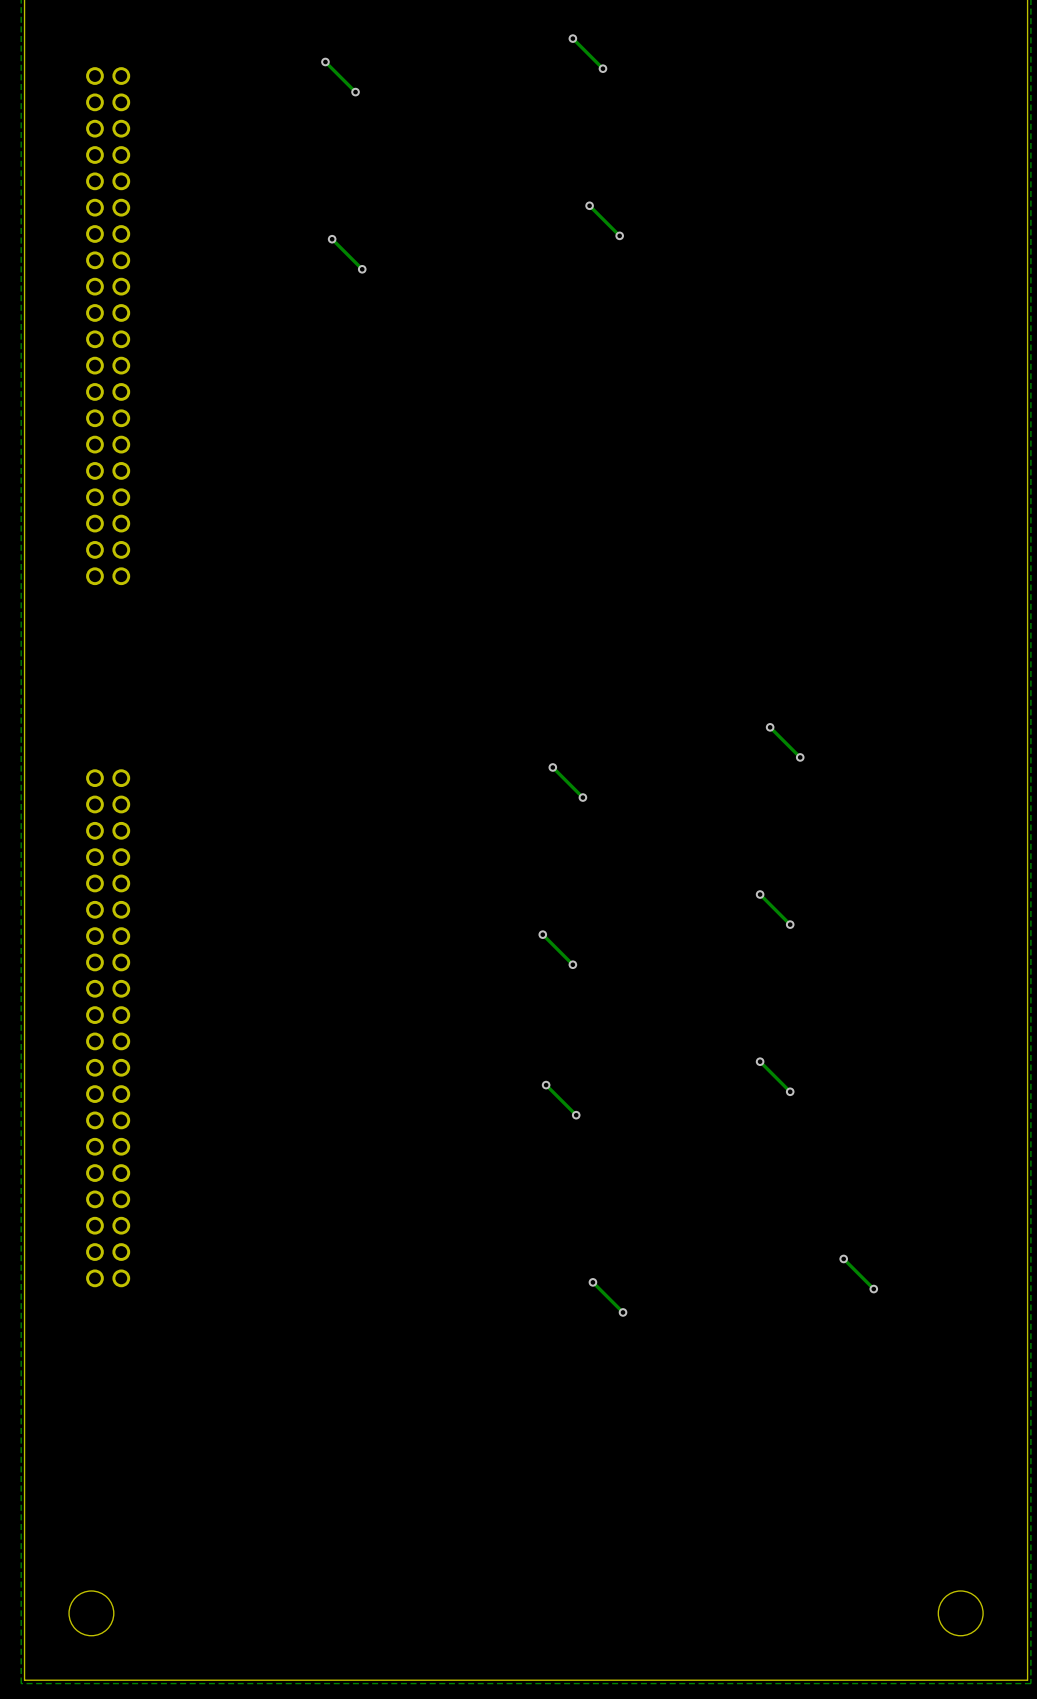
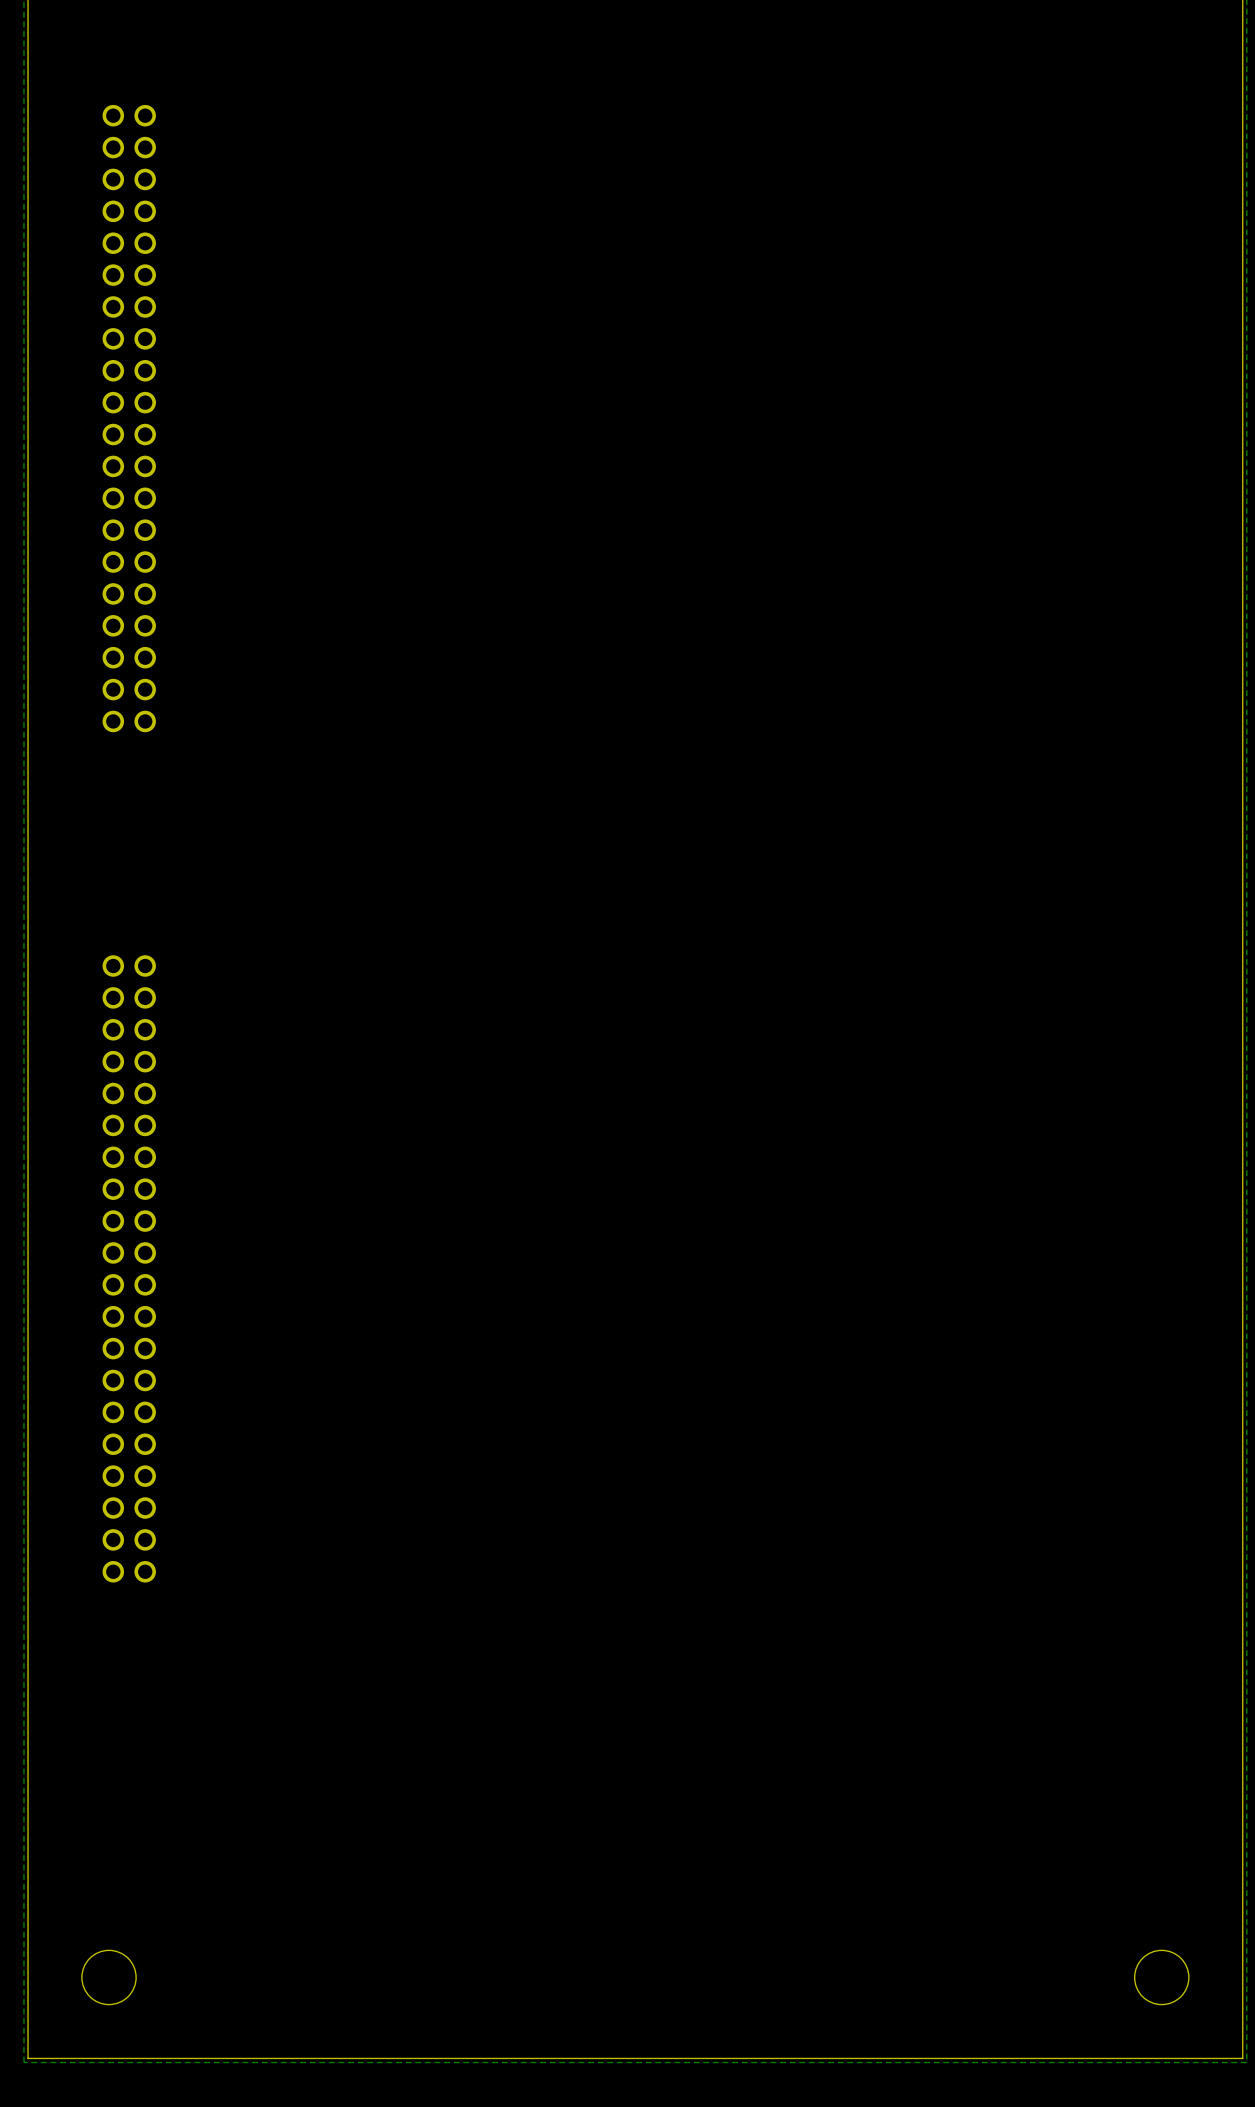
track: (572, 38) (602, 68) -> none
via: (572, 38) -> none
track: (325, 61) (355, 92) -> none
via: (325, 61) -> none
via: (602, 68) -> none
via: (355, 92) -> none
track: (589, 205) (619, 235) -> none
via: (589, 205) -> none
via: (619, 235) -> none
track: (332, 239) (362, 269) -> none
via: (332, 239) -> none
via: (362, 269) -> none
track: (770, 727) (800, 757) -> none
via: (770, 727) -> none
via: (800, 757) -> none
track: (552, 767) (582, 797) -> none
via: (552, 767) -> none
via: (582, 797) -> none
track: (760, 894) (790, 924) -> none
via: (760, 894) -> none
via: (790, 924) -> none
track: (542, 934) (572, 964) -> none
via: (542, 934) -> none
via: (572, 964) -> none
track: (760, 1061) (790, 1091) -> none
via: (760, 1061) -> none
track: (546, 1085) (576, 1115) -> none
via: (546, 1085) -> none
via: (790, 1091) -> none
via: (576, 1115) -> none
track: (843, 1258) (873, 1289) -> none
via: (843, 1258) -> none
track: (592, 1282) (623, 1312) -> none
via: (592, 1282) -> none
via: (873, 1289) -> none
via: (623, 1312) -> none

